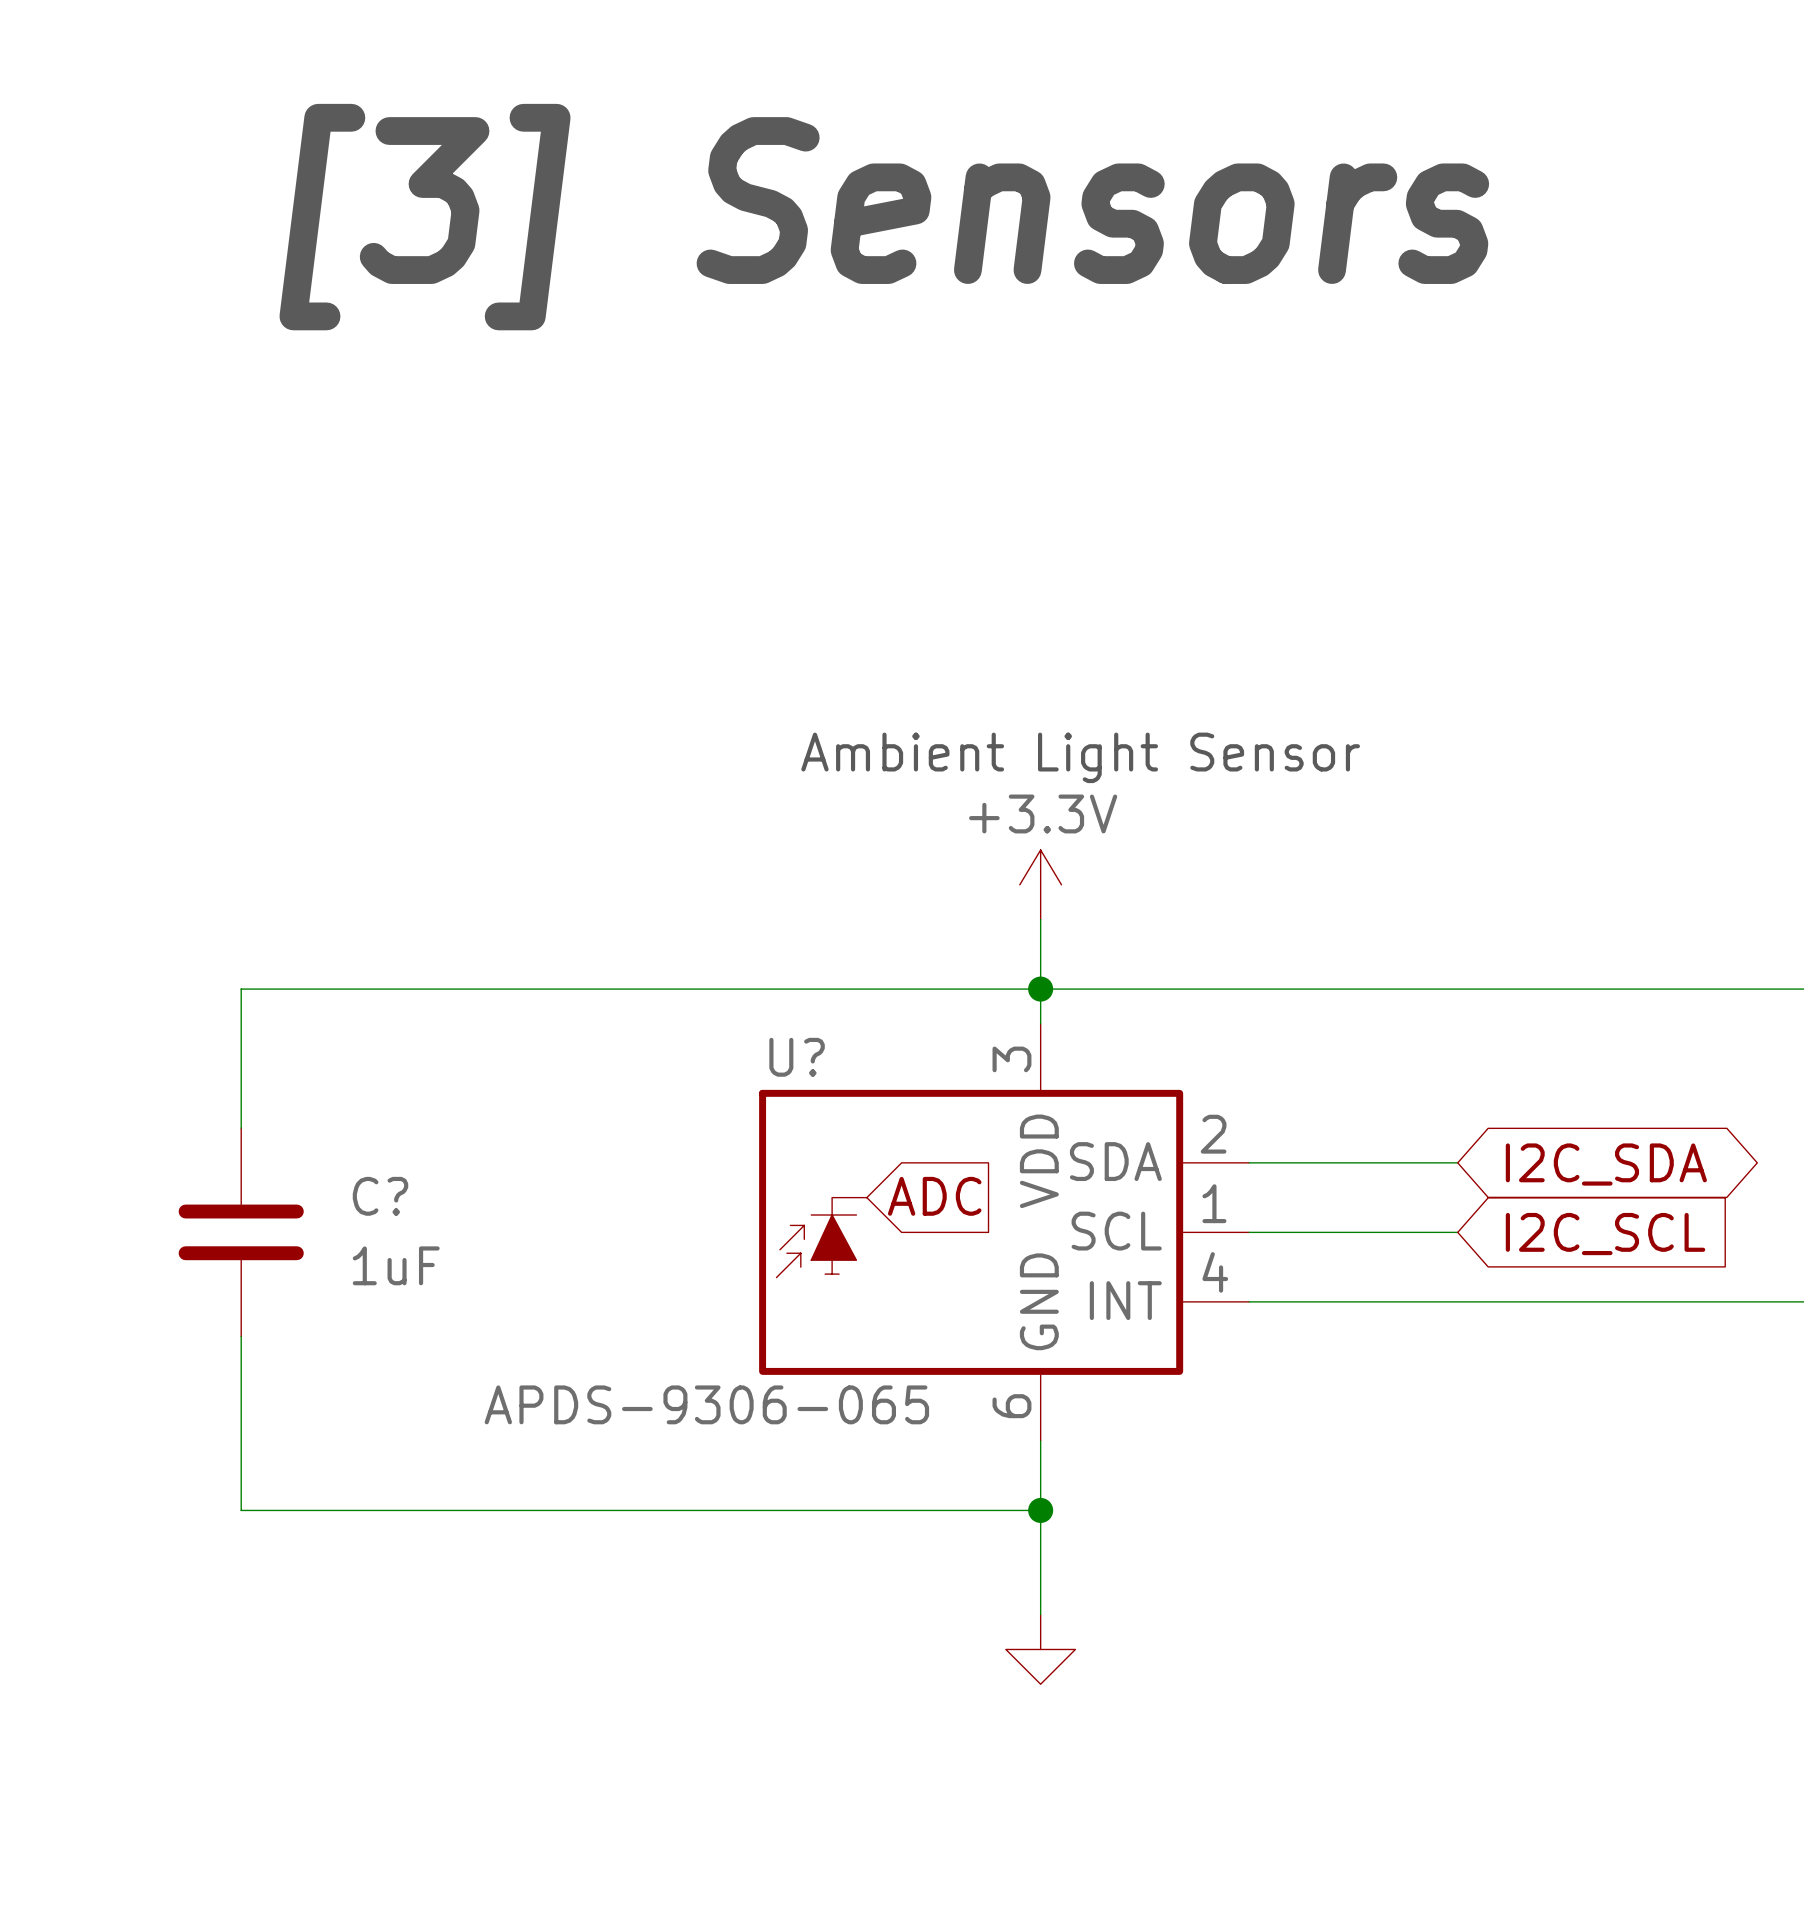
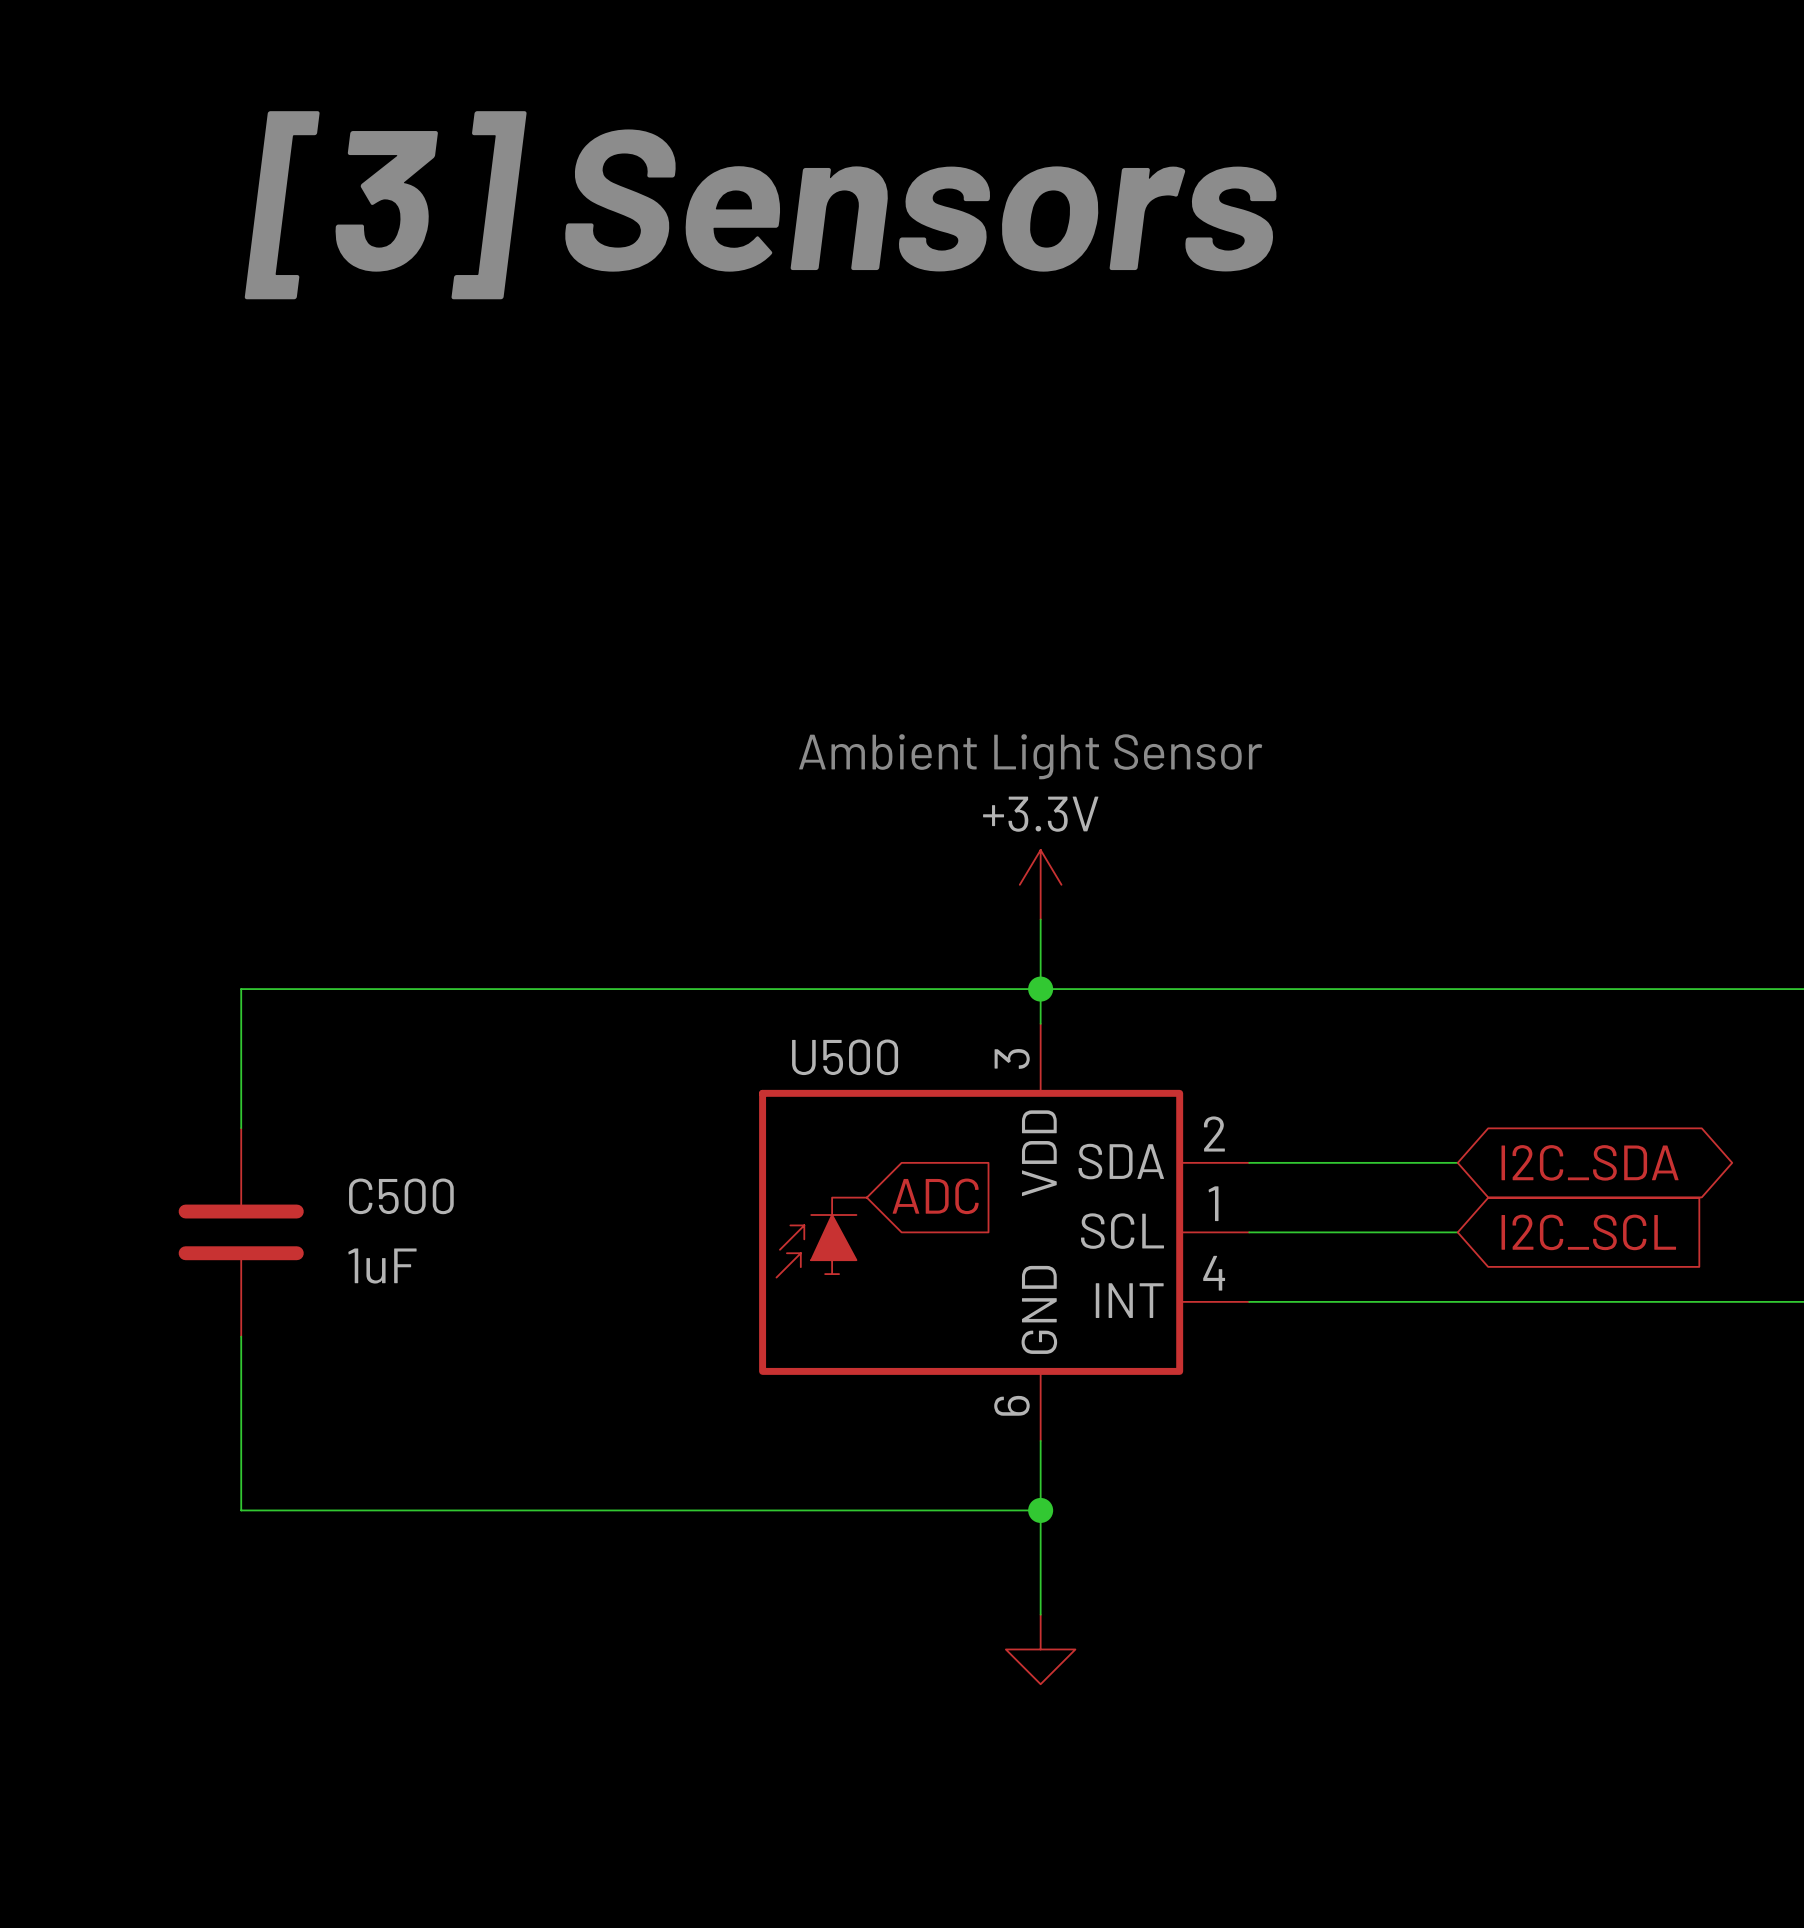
U? name: U? (797, 1057) -> U500 (845, 1057)
C? name: C? (380, 1196) -> C500 (401, 1196)
U? value: APDS-9306-065 (706, 1404) -> none

